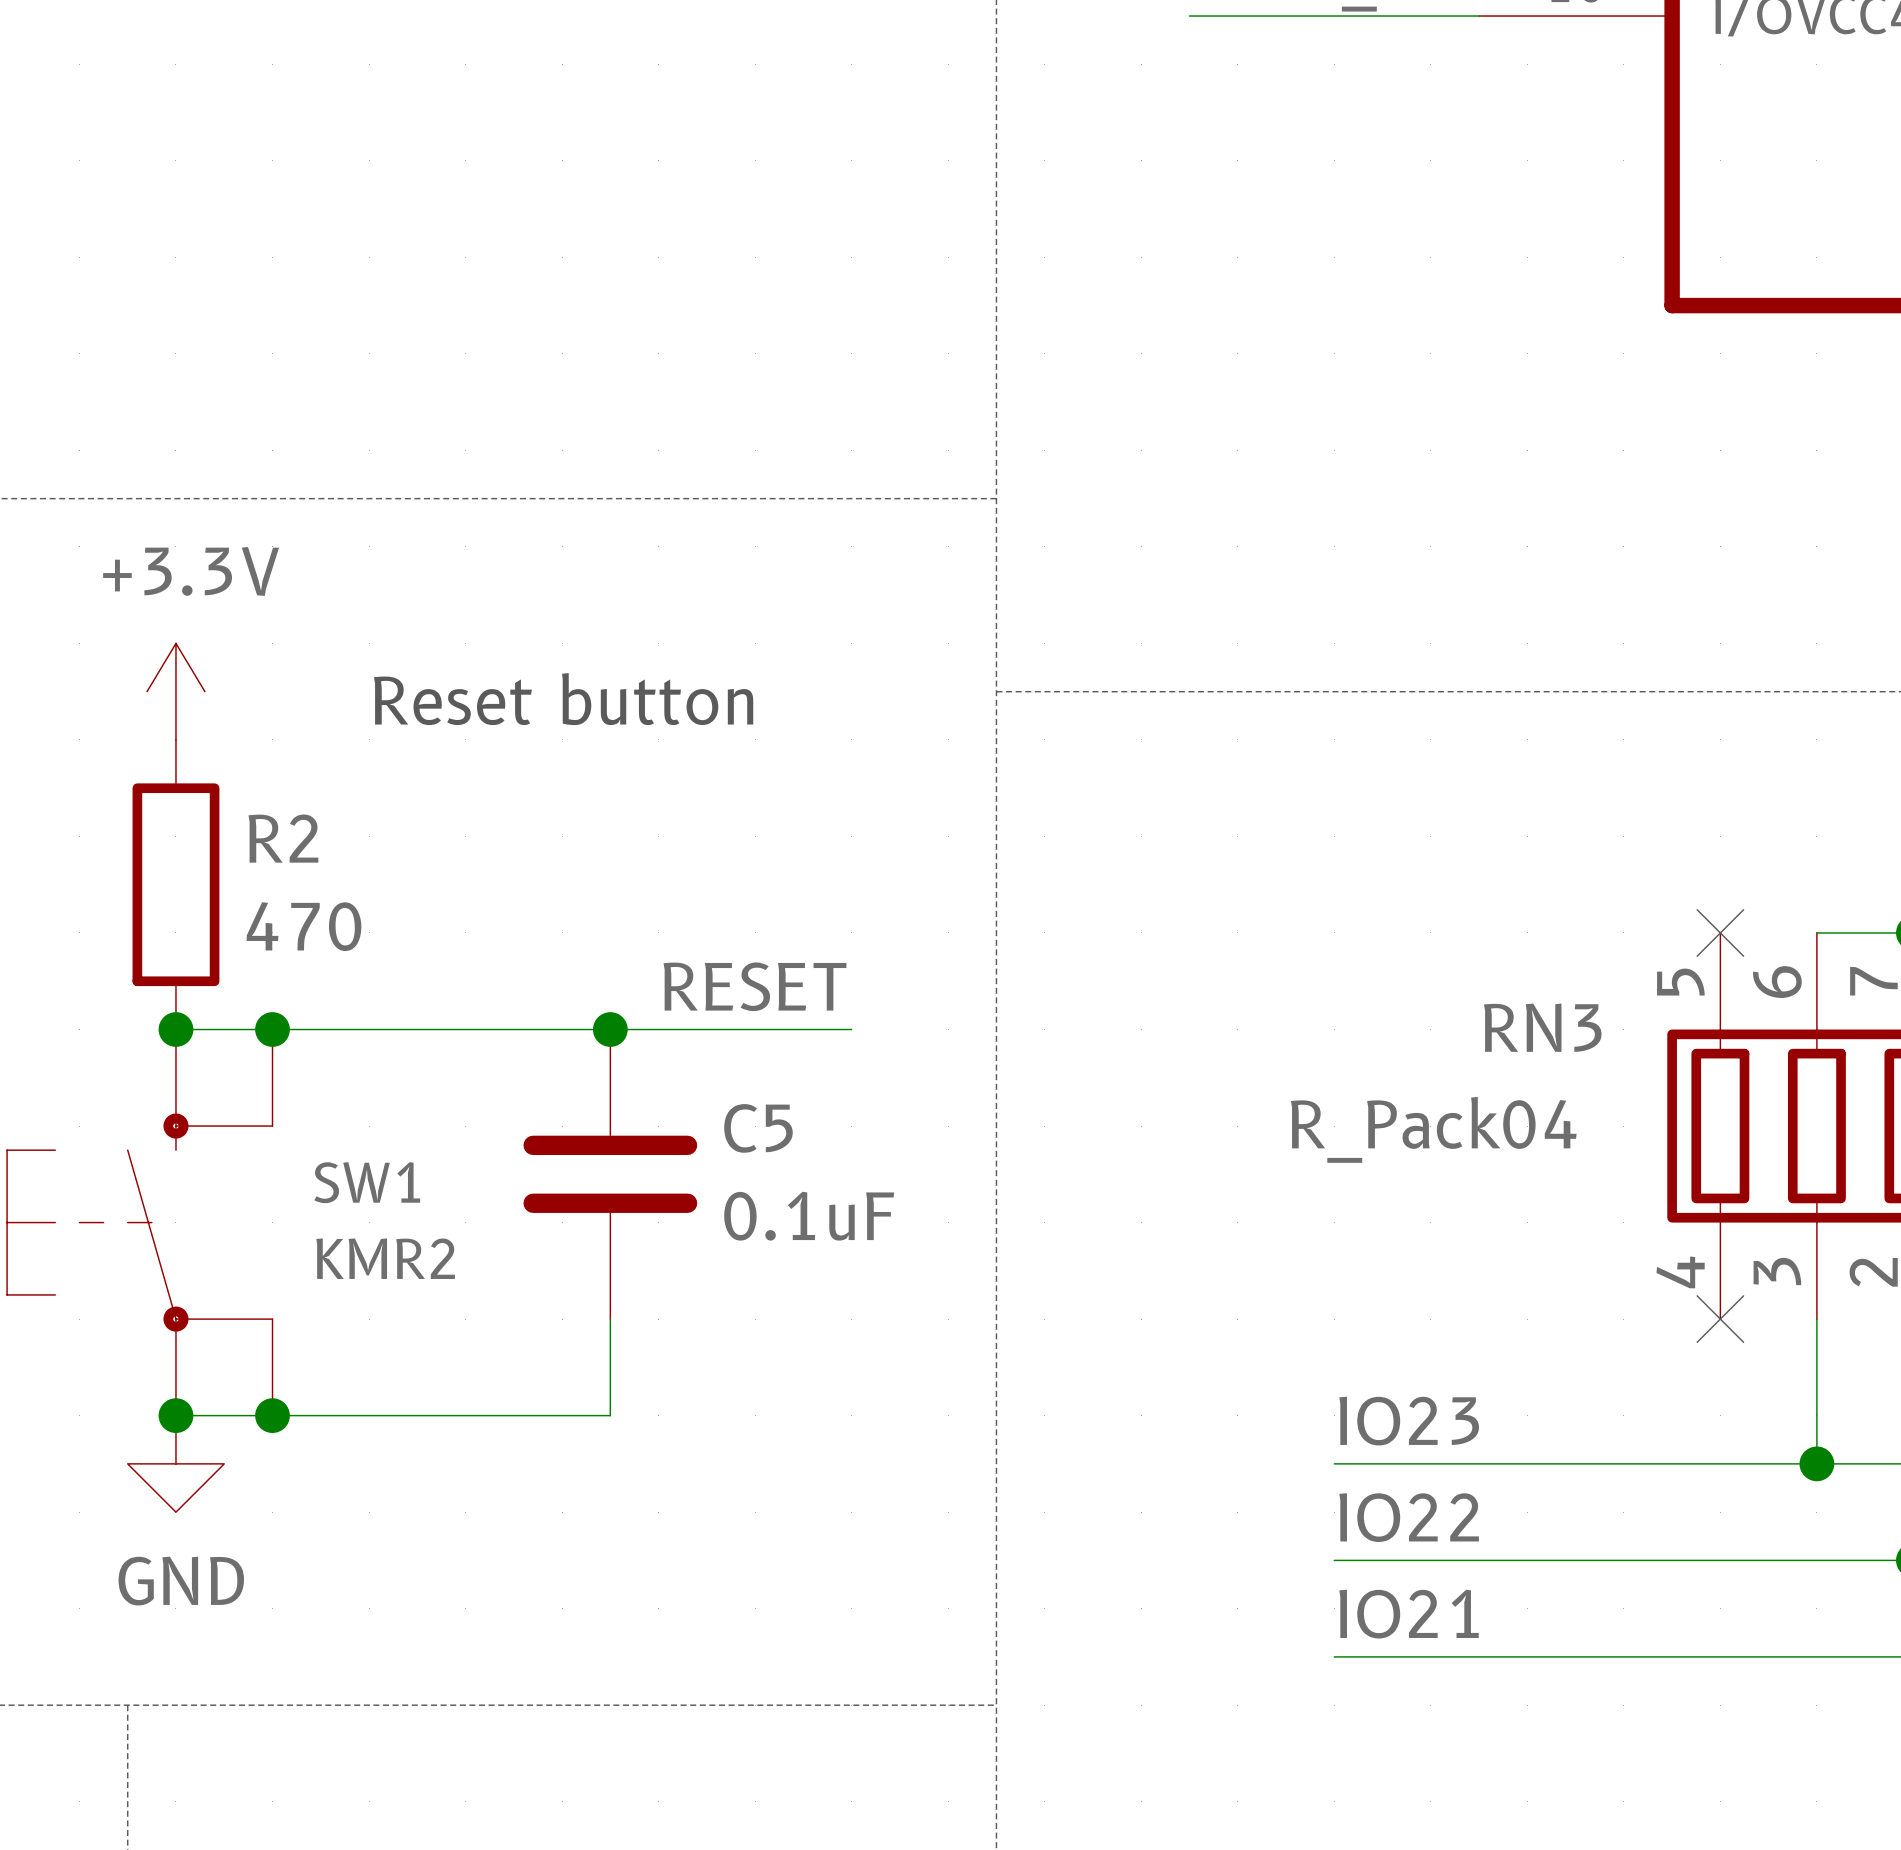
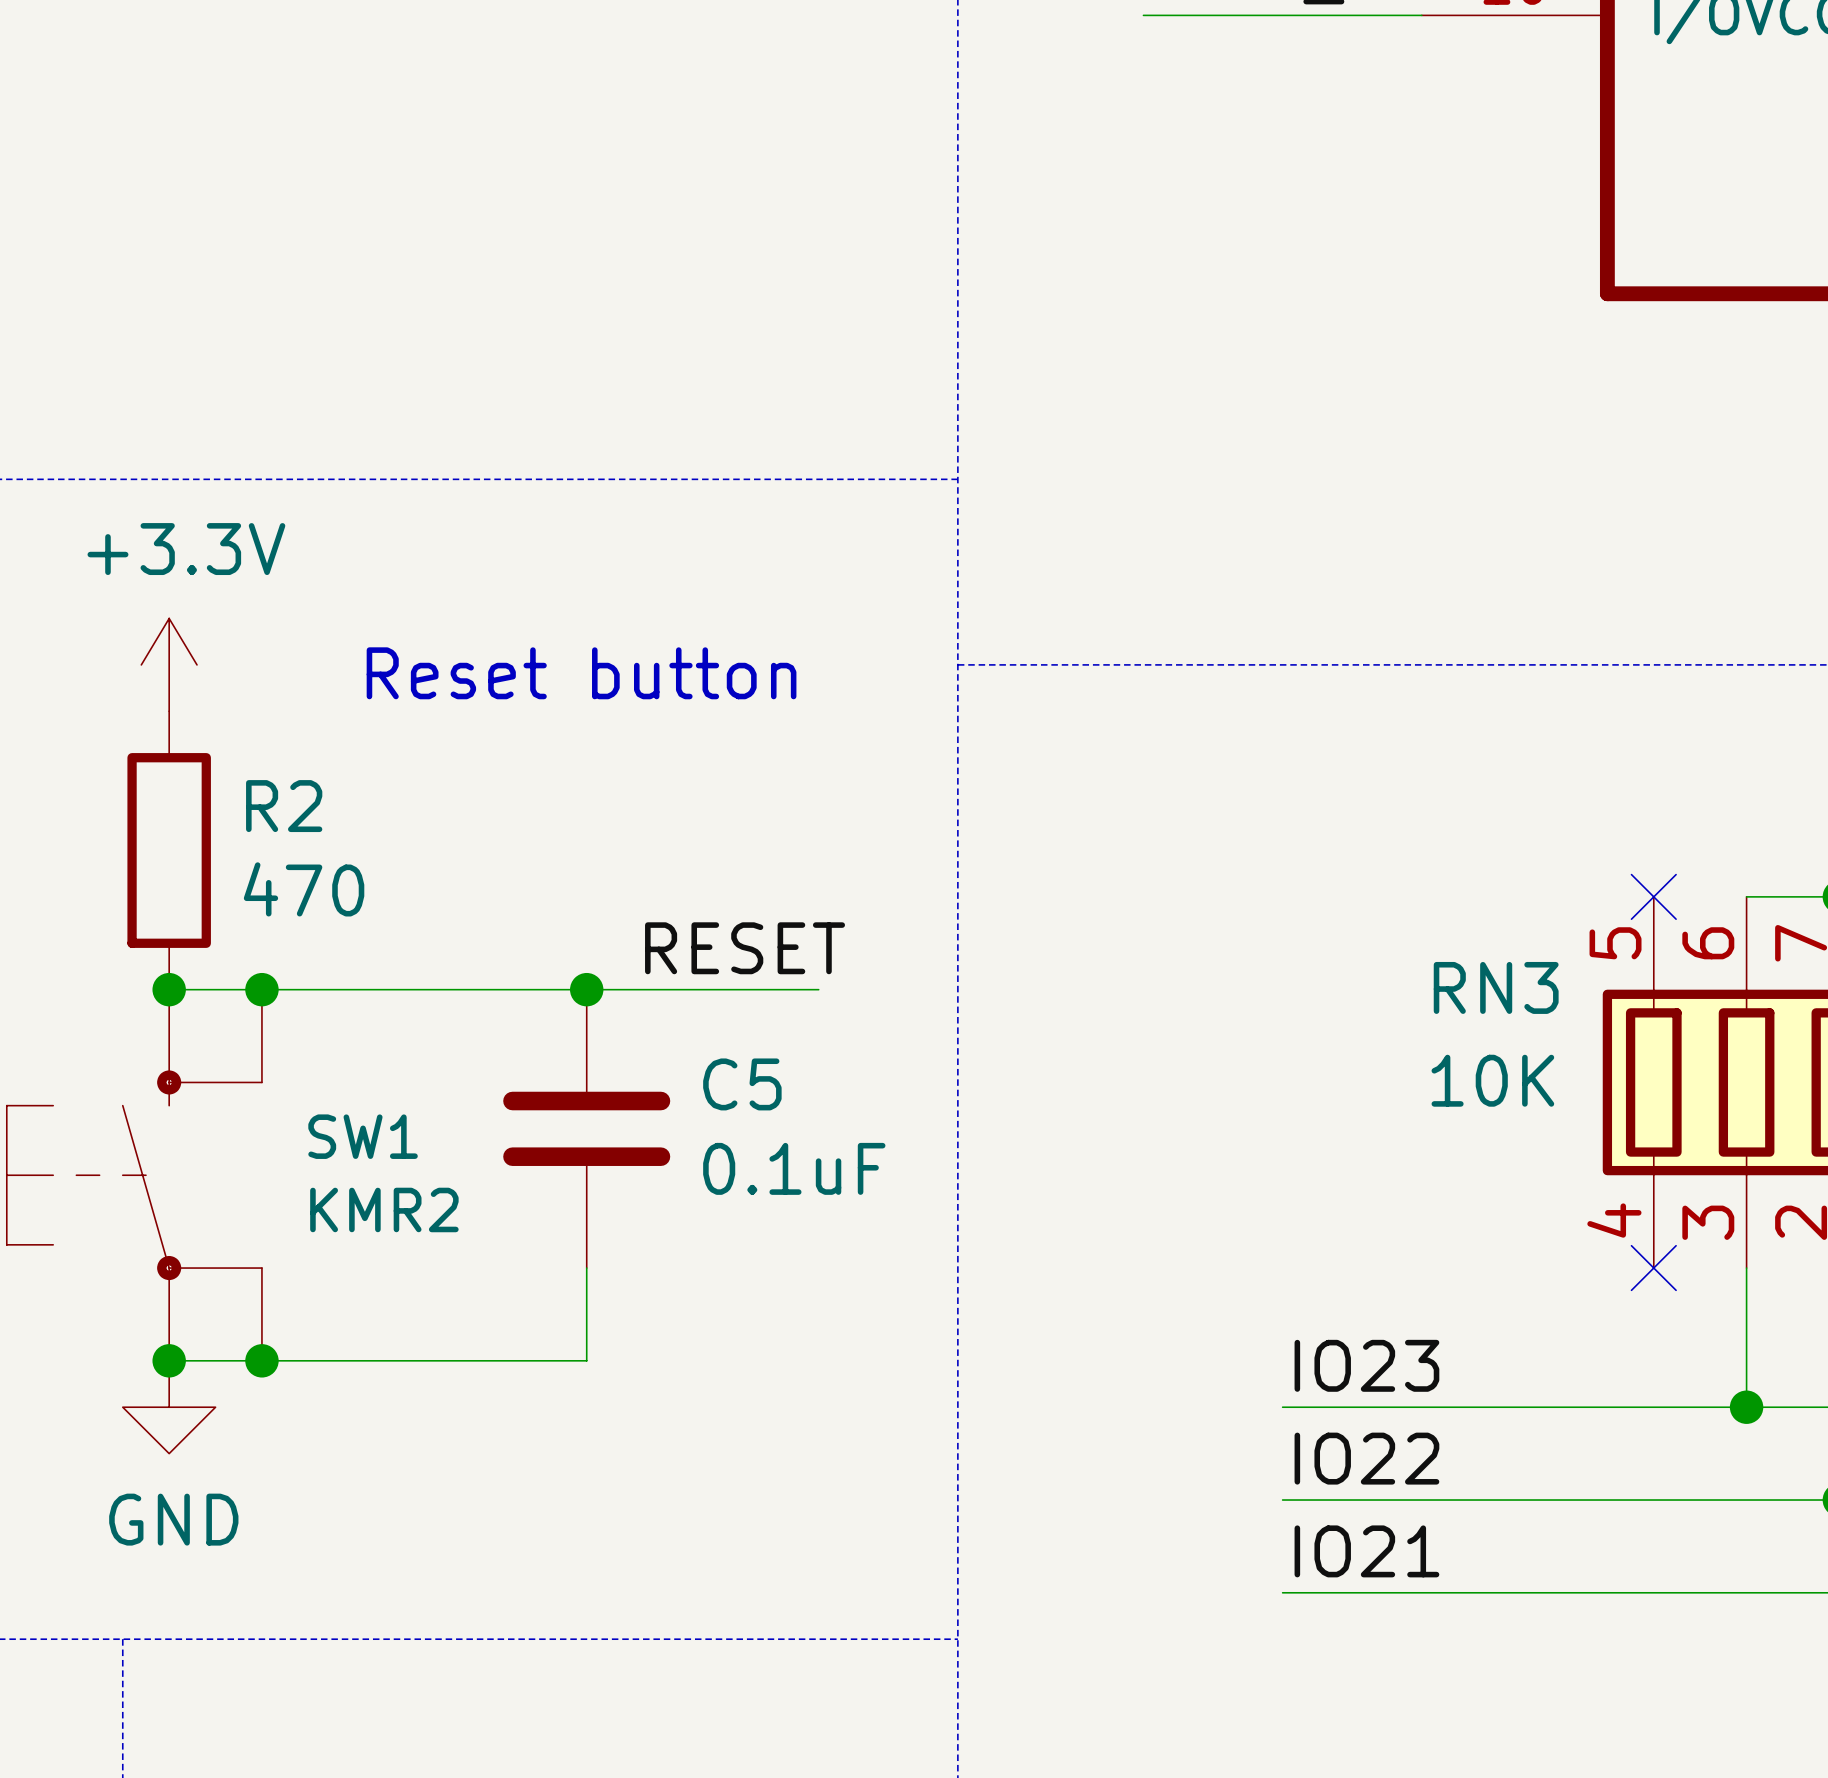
RN3 value: R_Pack04 (1433, 1129) -> 10K (1492, 1080)

